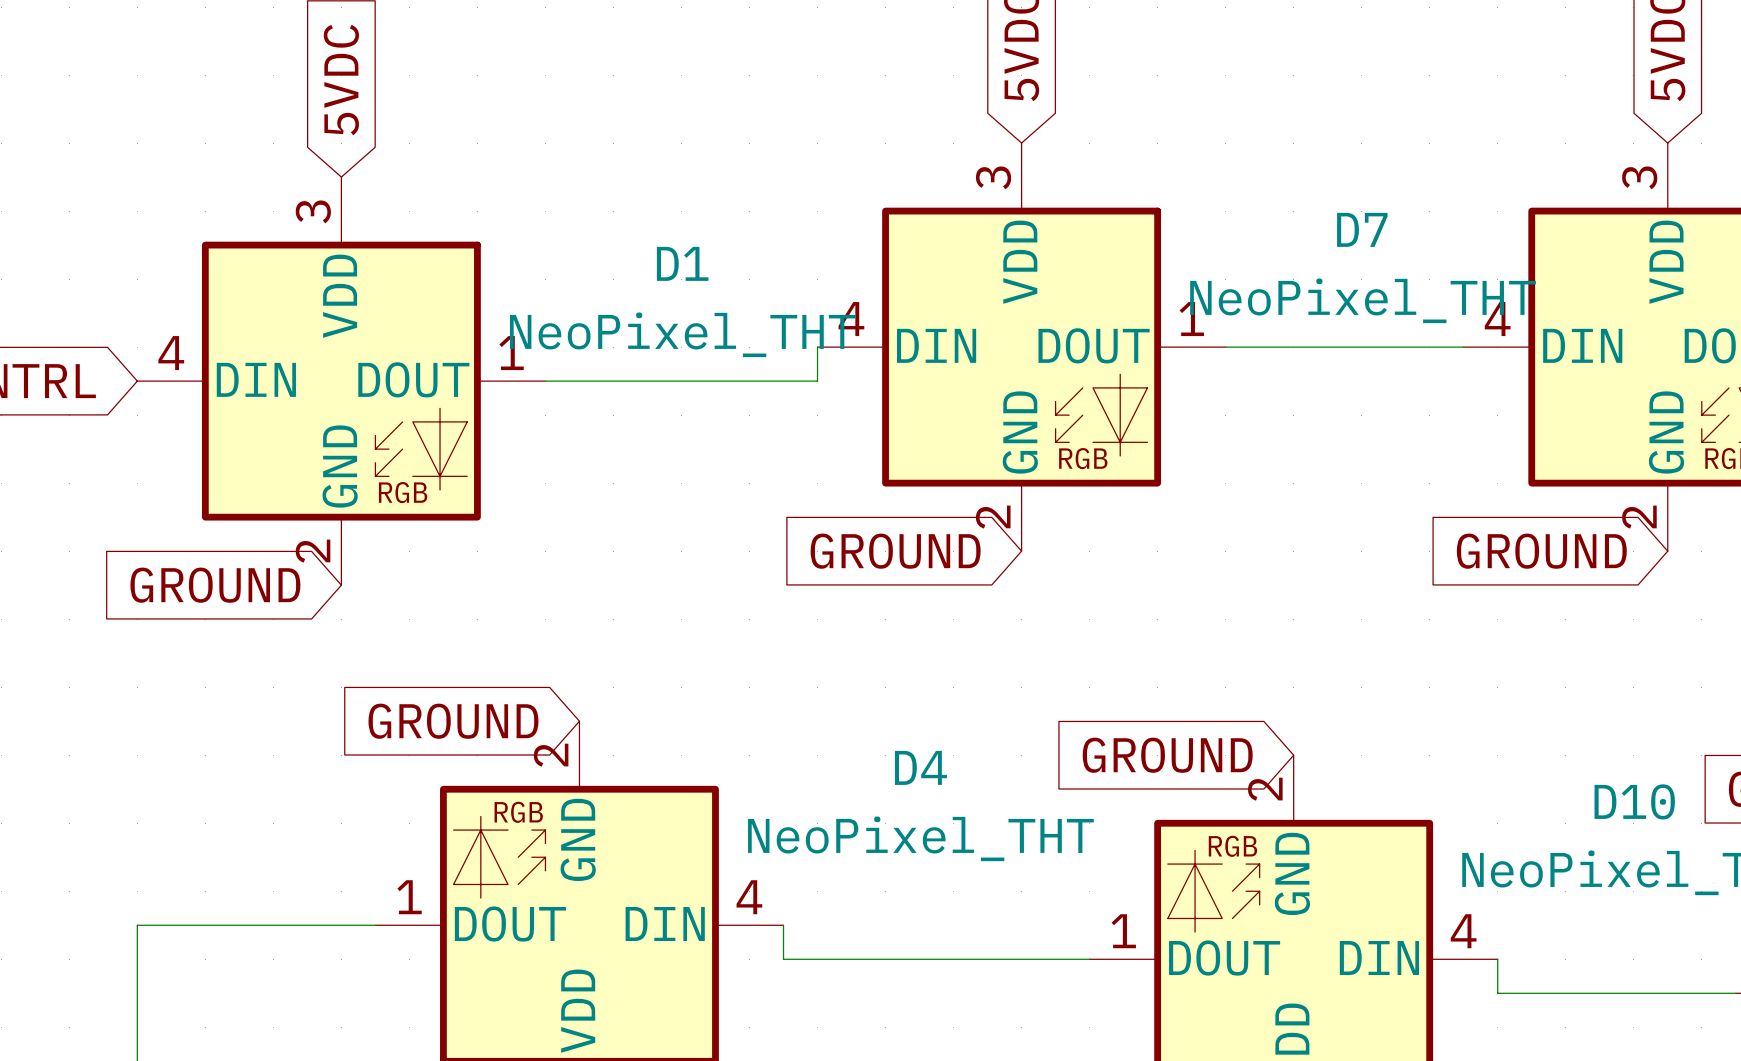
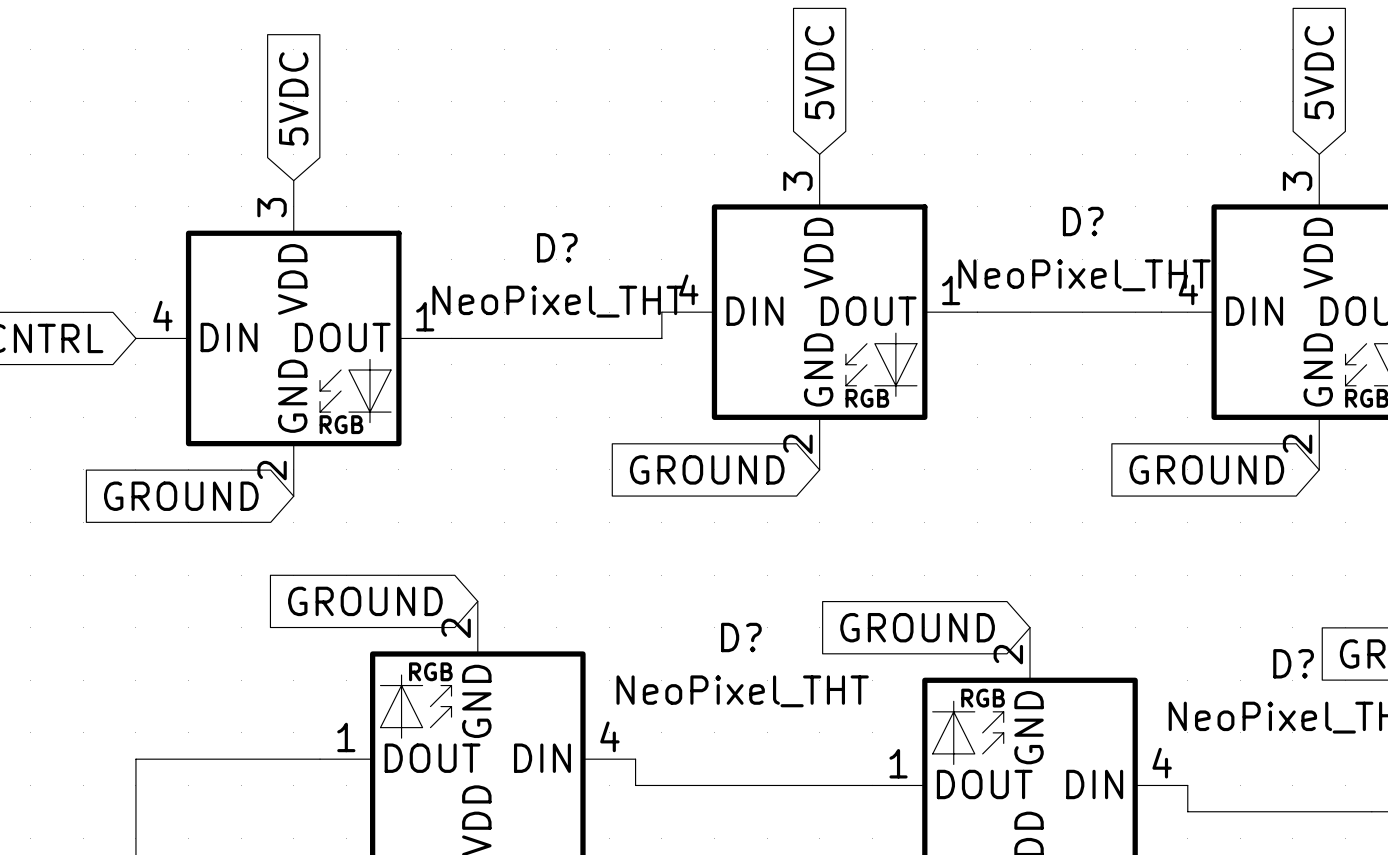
D7 name: D7 (1362, 229) -> D? (1083, 221)
D1 name: D1 (682, 263) -> D? (557, 247)
D4 name: D4 (920, 767) -> D? (741, 637)
D10 name: D10 (1634, 801) -> D? (1293, 663)

